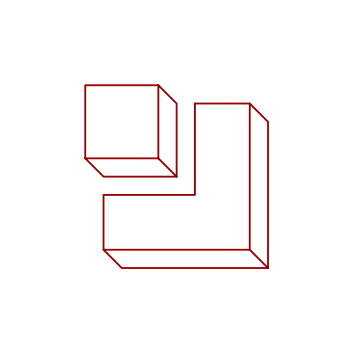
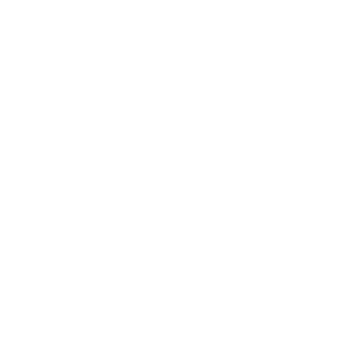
part: (176, 176) -> none

